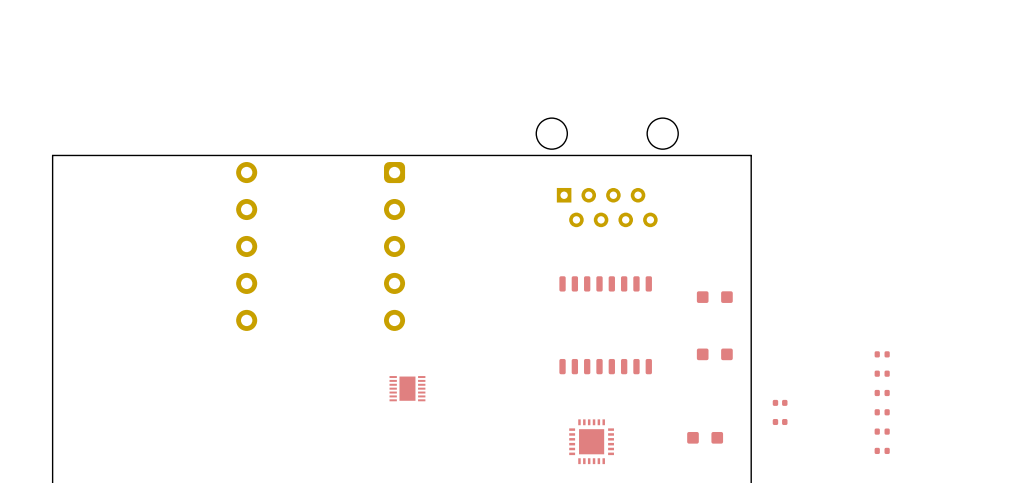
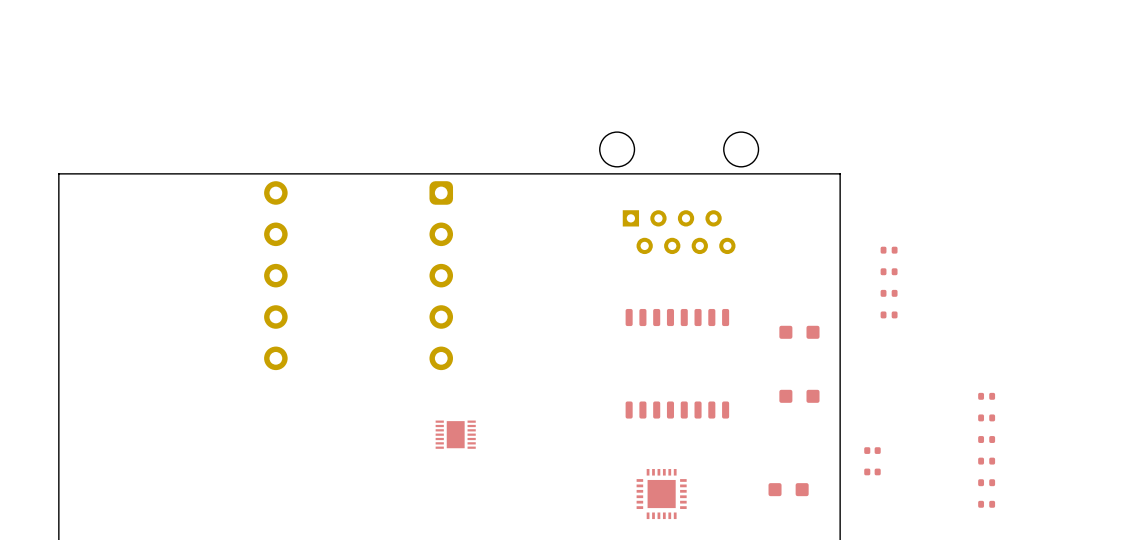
part: none -> (889, 250)
part: none -> (889, 271)
part: none -> (889, 293)
part: none -> (889, 314)

